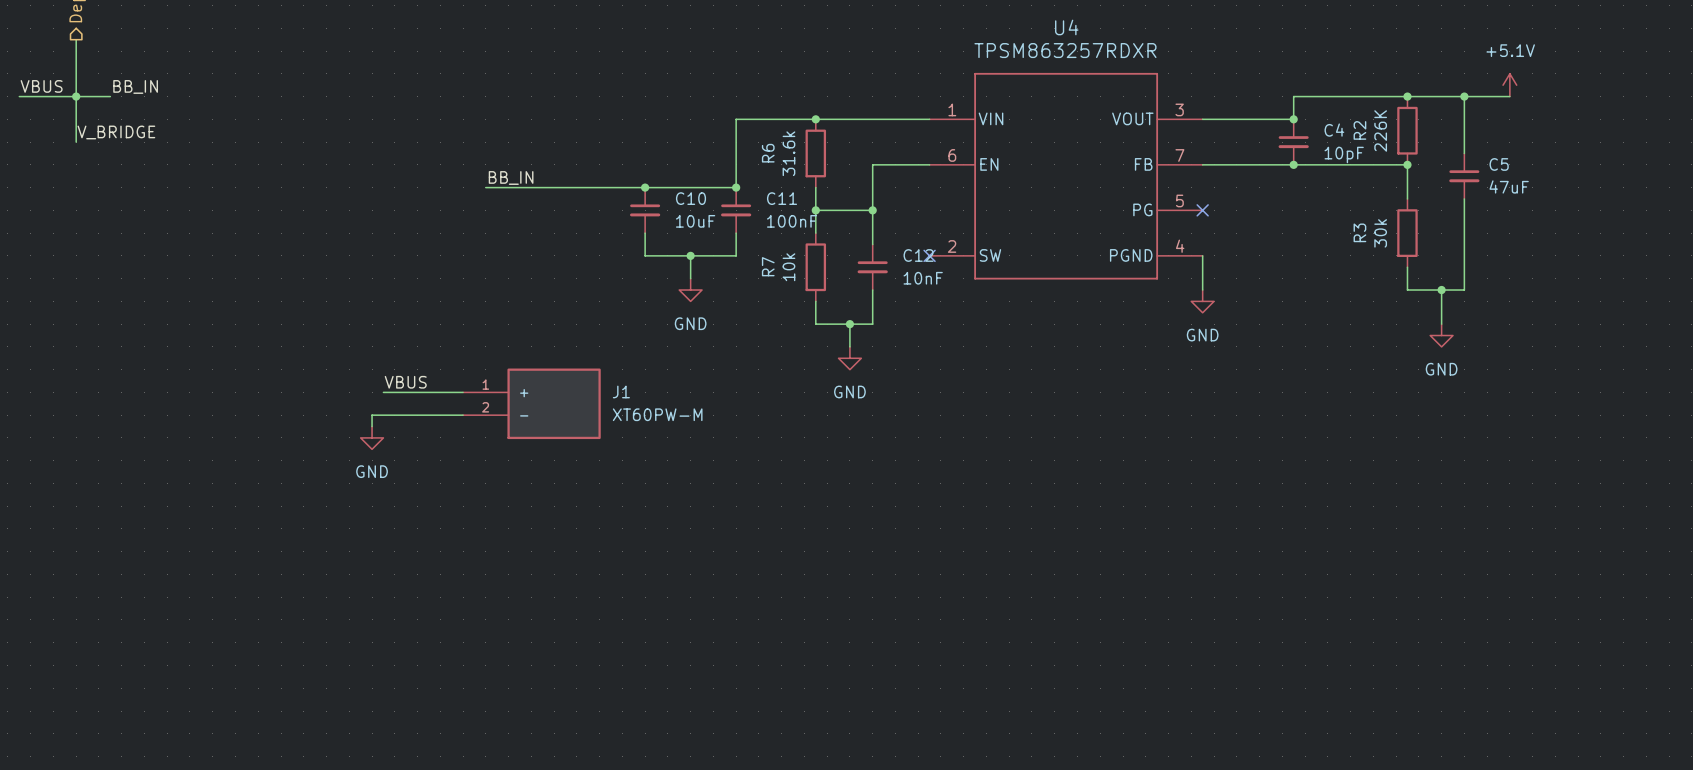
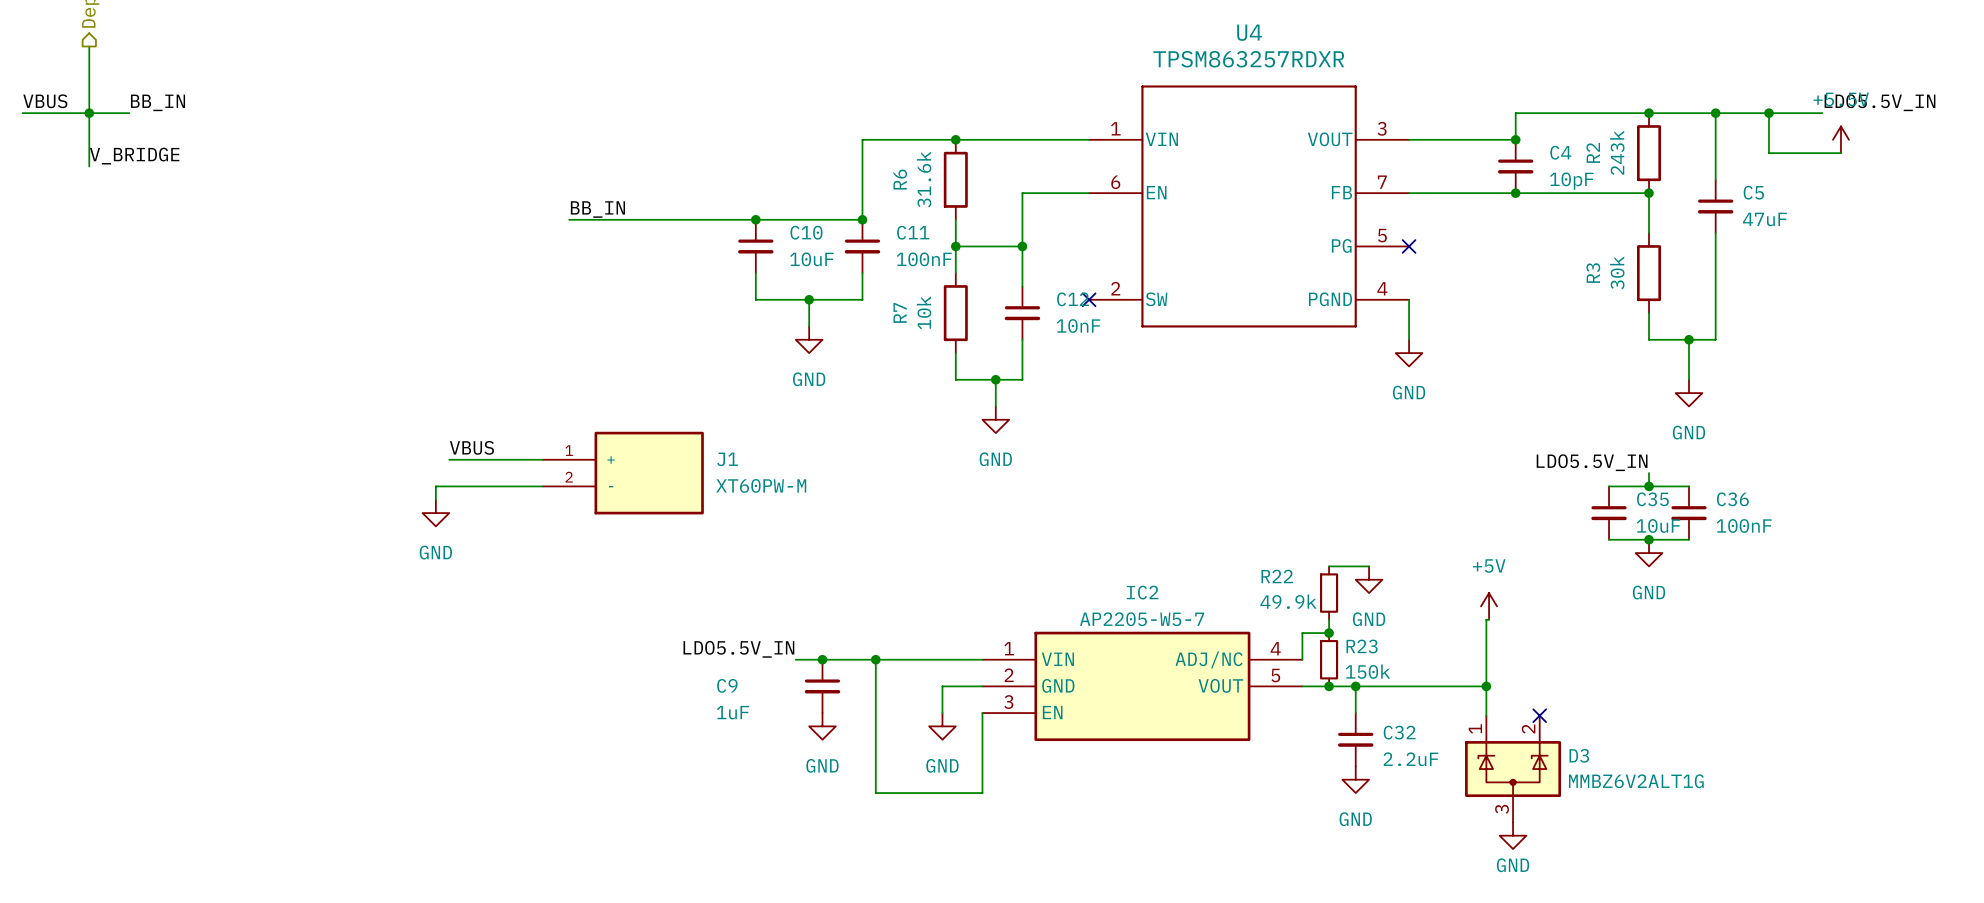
power symbol: +5.1V (1509, 85) -> none
label: none -> LDO5.5V_IN (1880, 102)
junction: none -> (1768, 113)
wire: none -> (1822, 113) (1768, 113) (1768, 153) (1840, 153)
power symbol: none -> +5.5V (1840, 139)
R2 value: 226K (1380, 130) -> 243k (1617, 152)
label: none -> LDO5.5V_IN (1592, 462)
wire: none -> (1649, 473) (1649, 486)
wire: none -> (1609, 486) (1689, 486)
junction: none -> (1649, 486)
C35: none -> 10uF (1609, 513)
C36: none -> 100nF (1689, 513)
wire: none -> (1609, 539) (1689, 539)
junction: none -> (1649, 539)
power symbol: none -> GND (1649, 553)
wire: none -> (1329, 566) (1369, 566)
power symbol: none -> GND (1369, 579)
R22: none -> 49.9k (1329, 593)
power symbol: none -> +5V (1489, 606)
wire: none -> (1329, 619) (1329, 633) (1302, 633) (1302, 659)
wire: none -> (1489, 619) (1486, 619) (1486, 715)
junction: none -> (1329, 633)
label: none -> LDO5.5V_IN (738, 649)
wire: none -> (795, 659) (982, 659)
junction: none -> (822, 659)
wire: none -> (875, 659) (875, 793) (982, 793) (982, 713)
junction: none -> (875, 659)
R23: none -> 150k (1329, 659)
C9: none -> 1uF (822, 686)
wire: none -> (982, 686) (942, 686) (942, 713)
IC2: none -> AP2205-W5-7 (1142, 686)
wire: none -> (1302, 686) (1486, 686)
junction: none -> (1329, 686)
wire: none -> (1355, 686) (1355, 713)
junction: none -> (1355, 686)
junction: none -> (1486, 686)
no-connect mark: none -> (1539, 715)
power symbol: none -> GND (822, 726)
power symbol: none -> GND (942, 726)
C32: none -> 2.2uF (1355, 739)
D3: none -> MMBZ6V2ALT1G (1513, 769)
power symbol: none -> GND (1355, 779)
power symbol: none -> GND (1513, 835)

